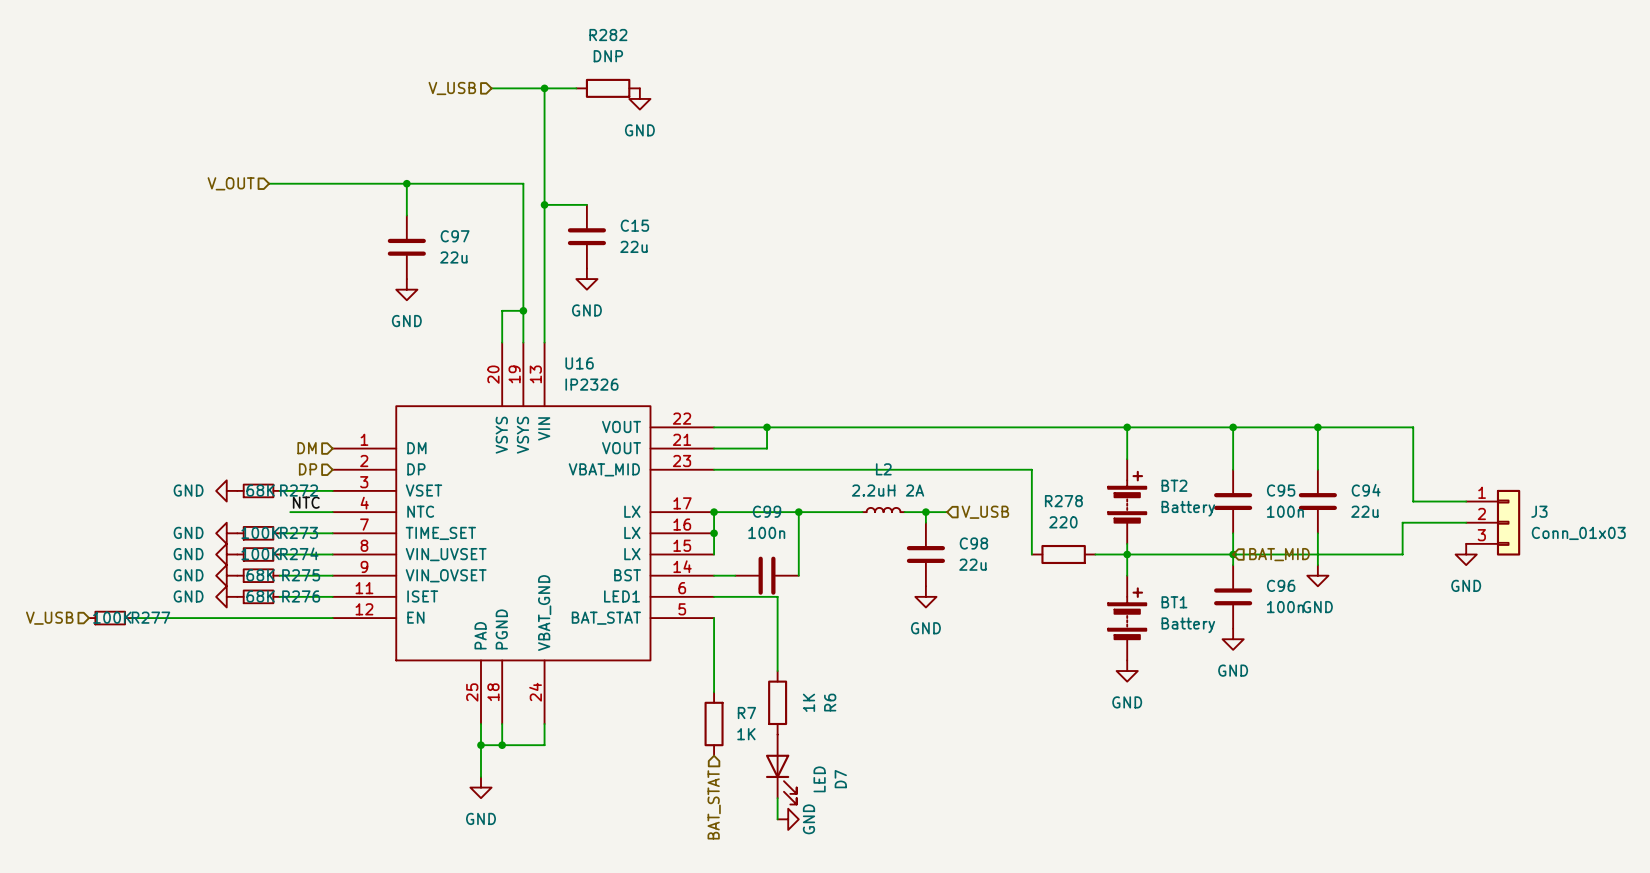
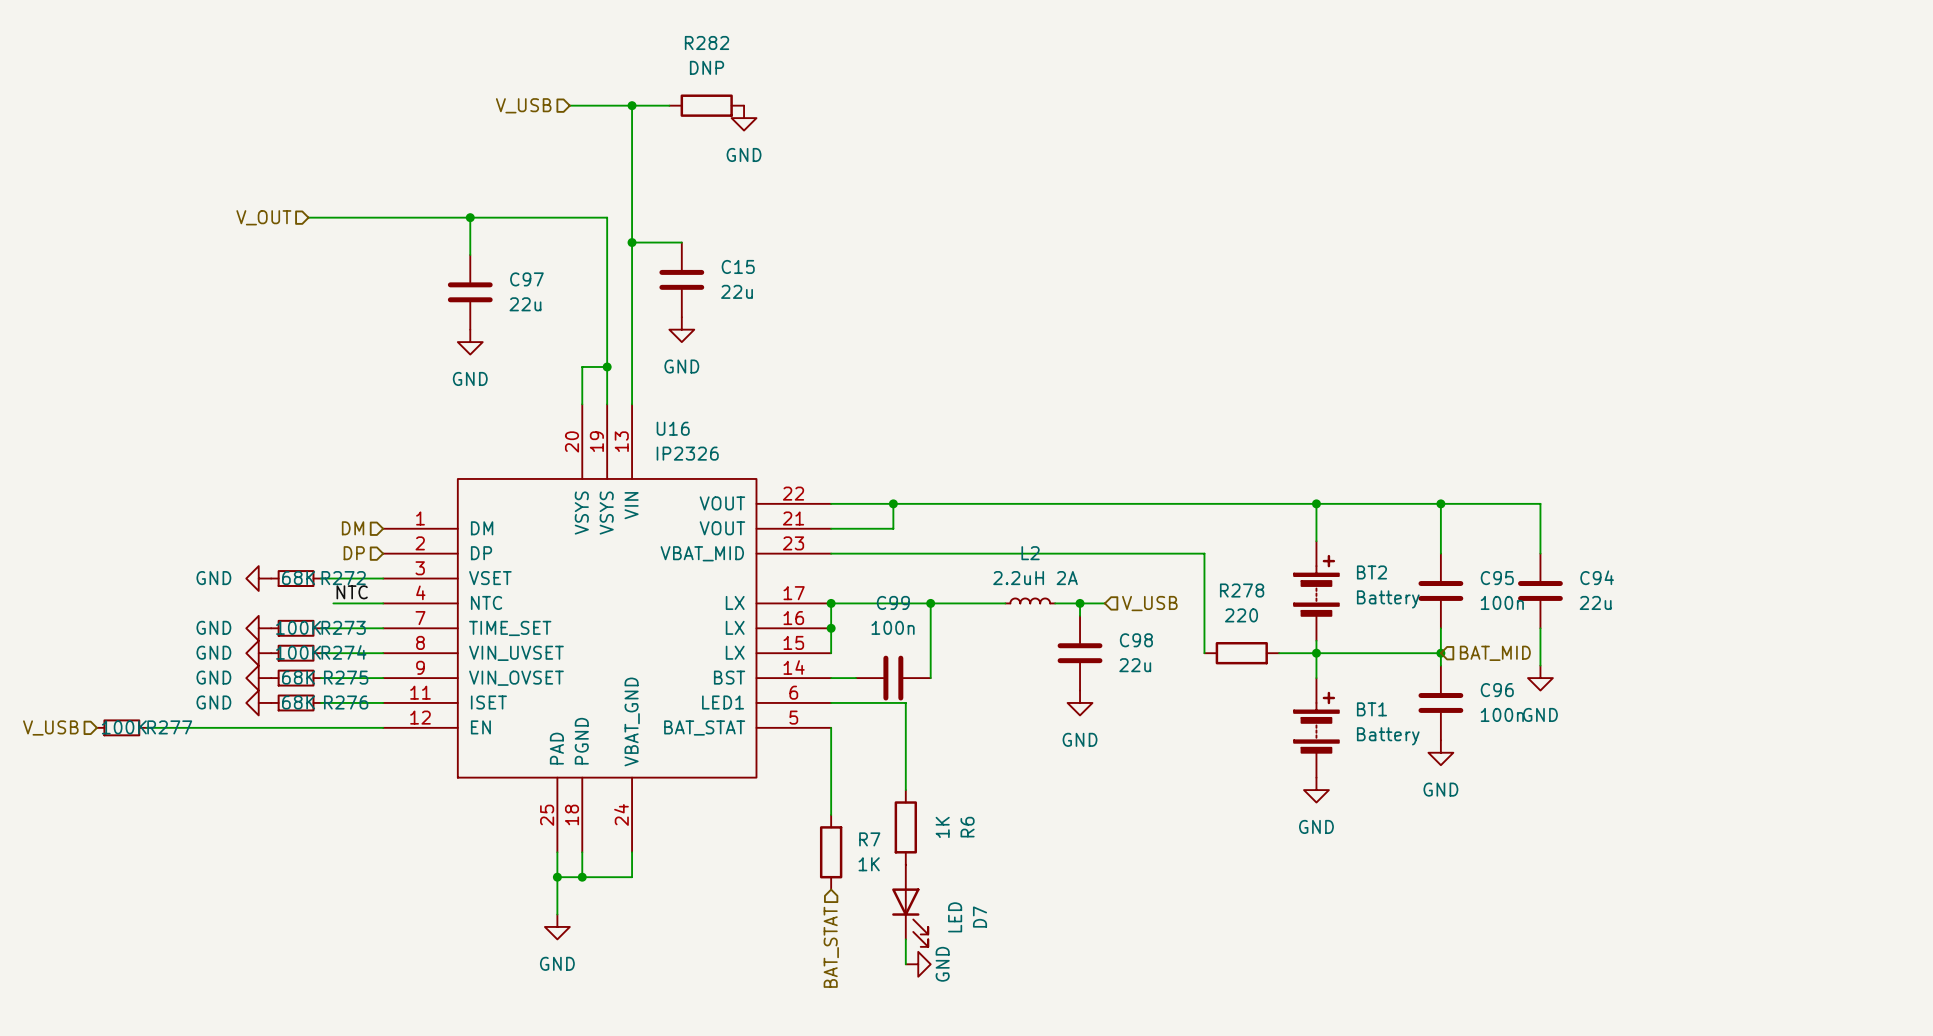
wire: (1317, 427) (1413, 427) (1413, 501) (1466, 501) -> none
junction: (1317, 427) -> none
wire: (1466, 522) (1402, 522) (1402, 554) (1233, 554) -> none
J3: Conn_01x03 (1493, 522) -> none
power symbol: GND (1466, 554) -> none

